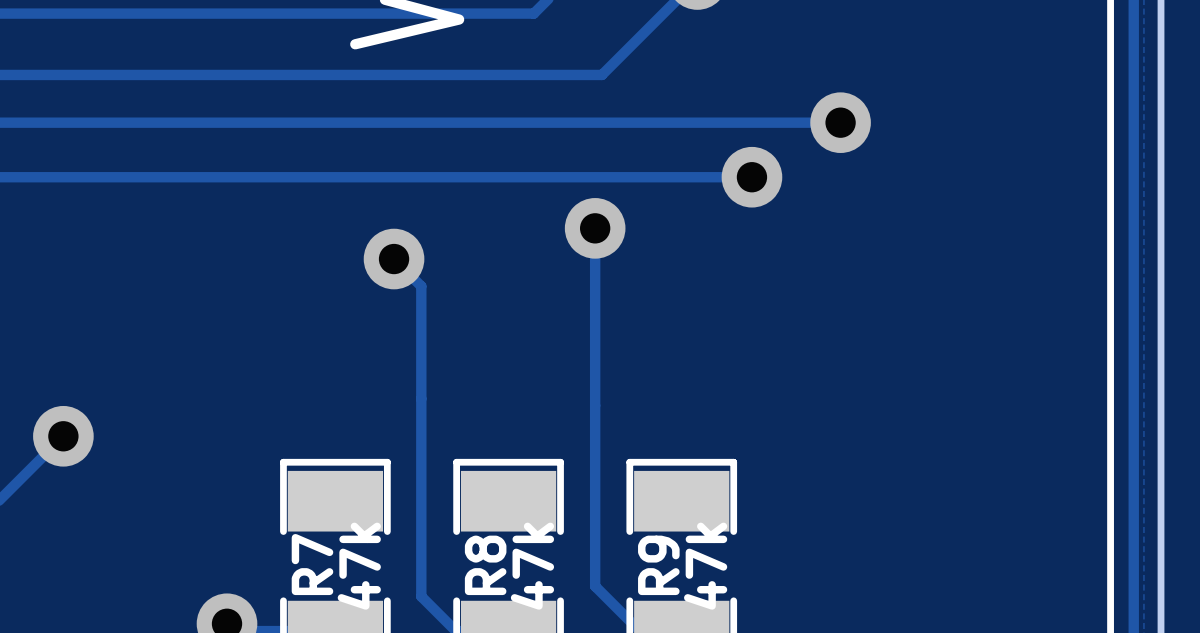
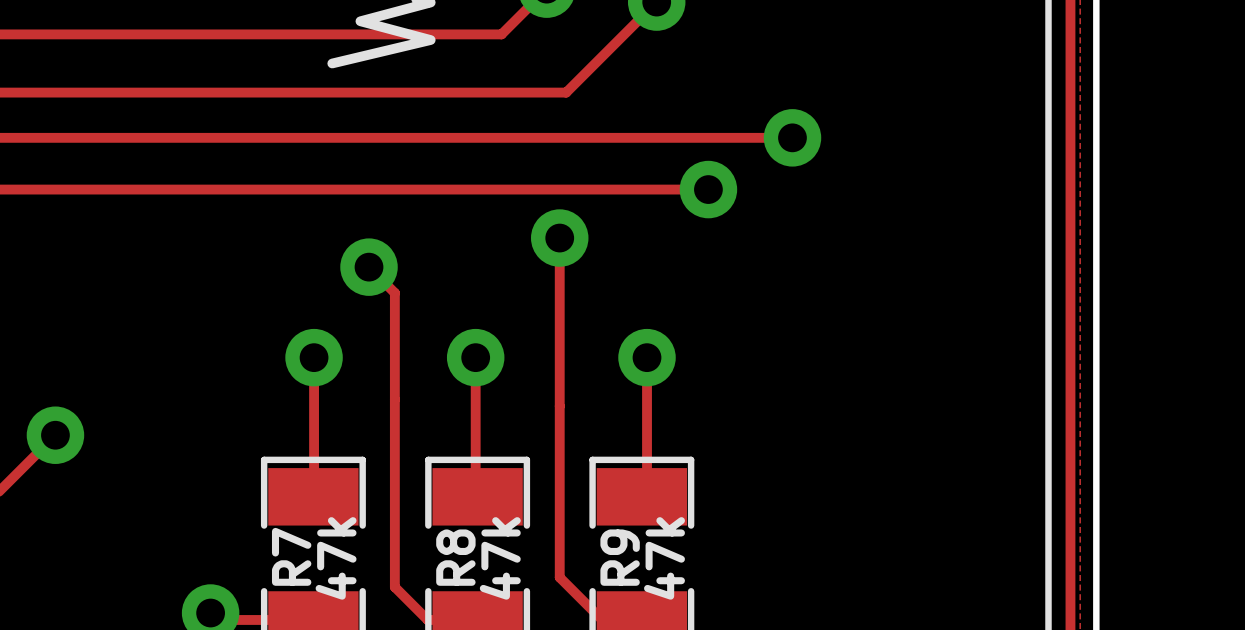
track: none -> (314, 357) (314, 496)
via: none -> (314, 357)
track: none -> (475, 357) (475, 494) (477, 496)
via: none -> (475, 357)
track: none -> (647, 357) (647, 491) (641, 496)
via: none -> (647, 357)

